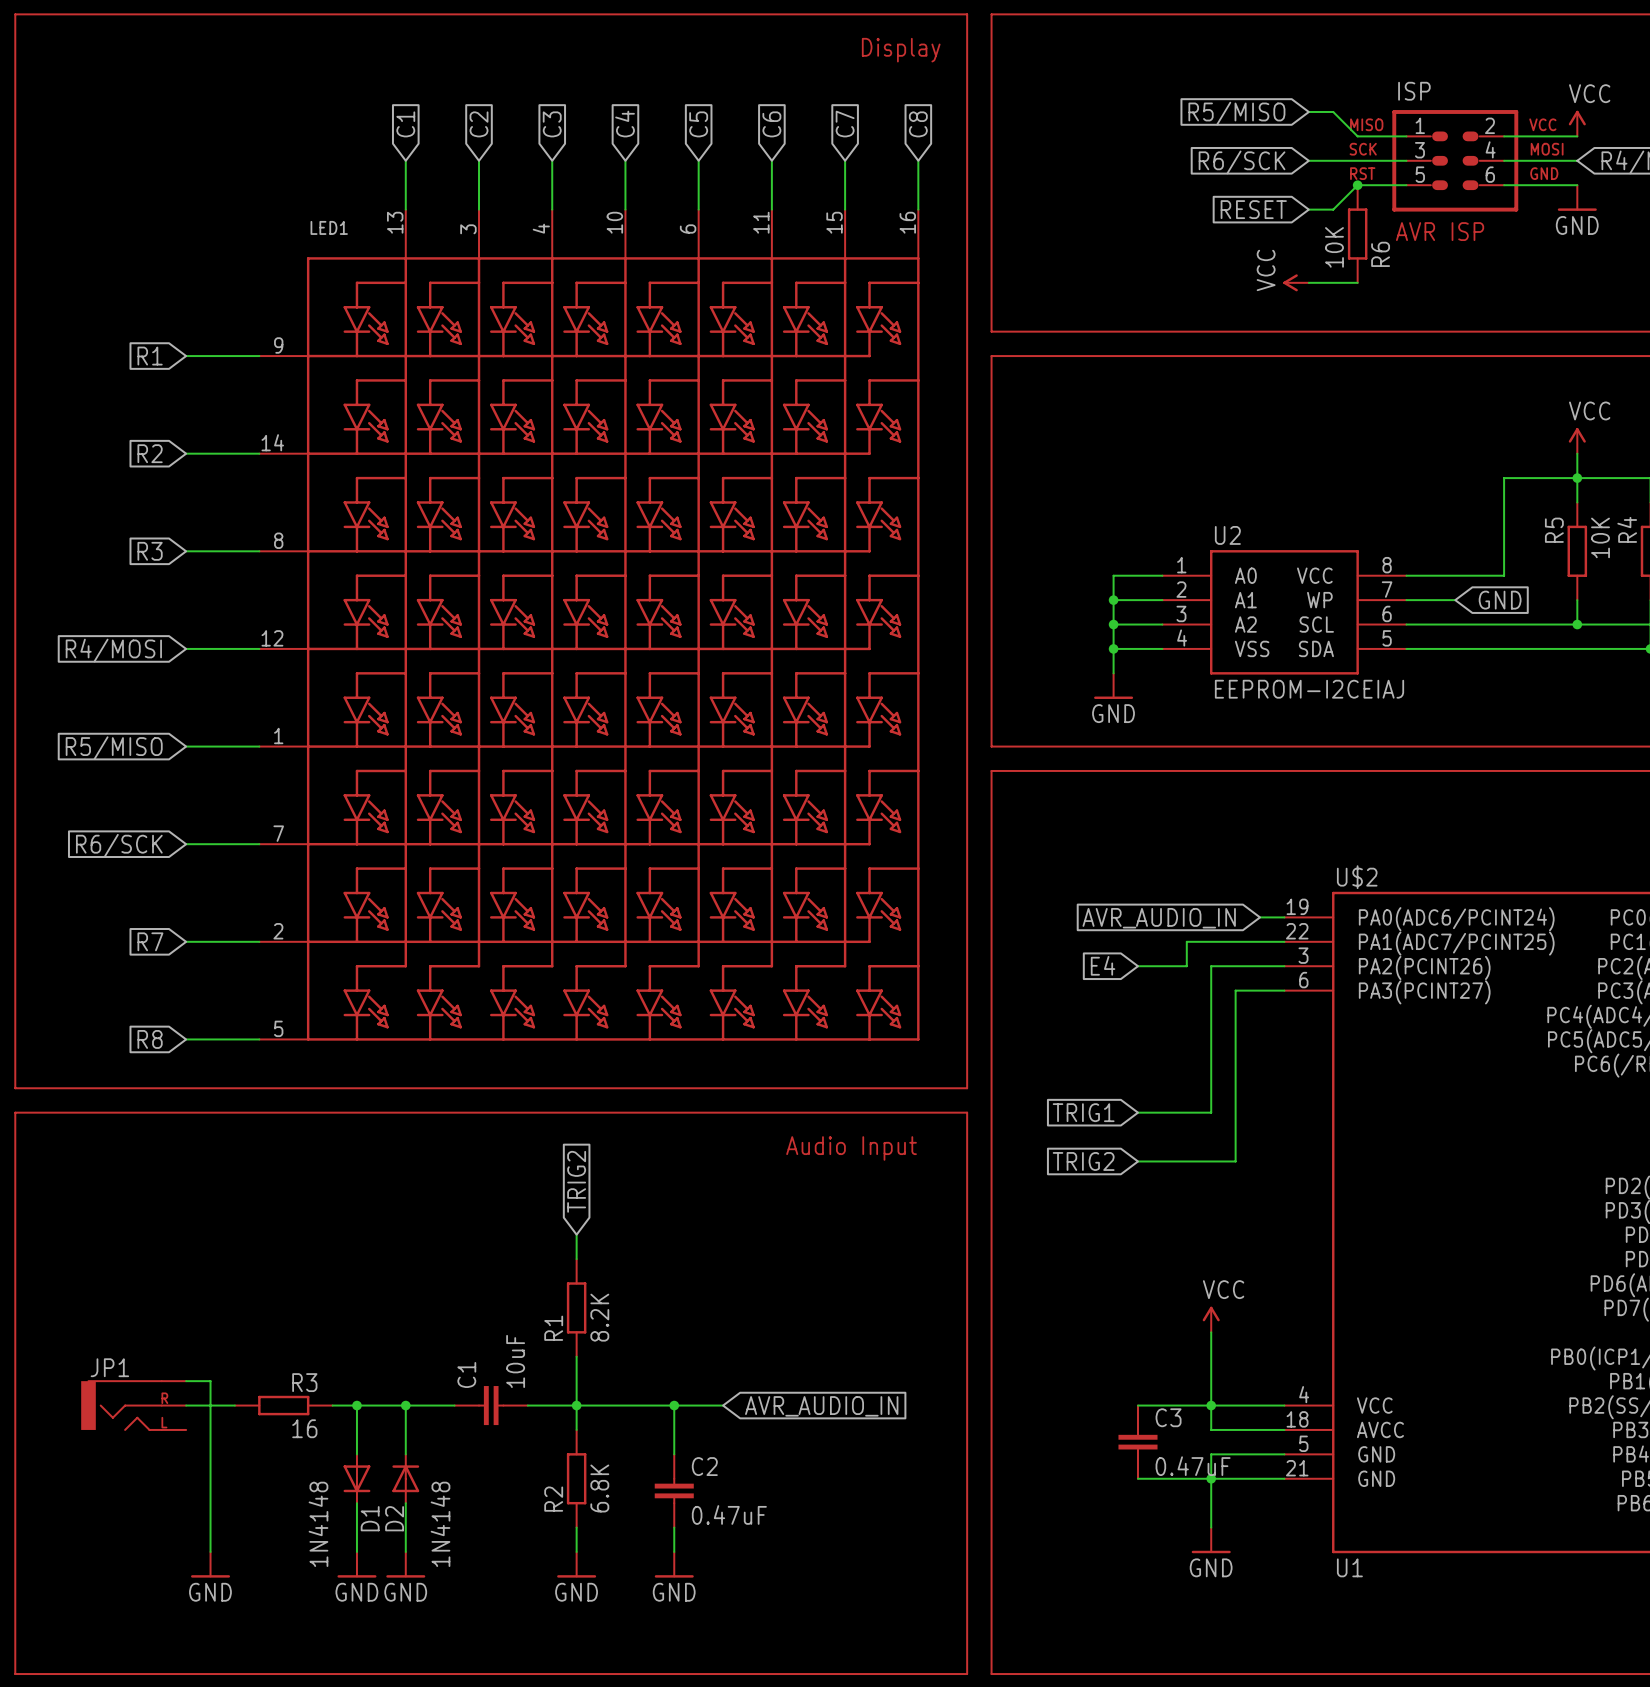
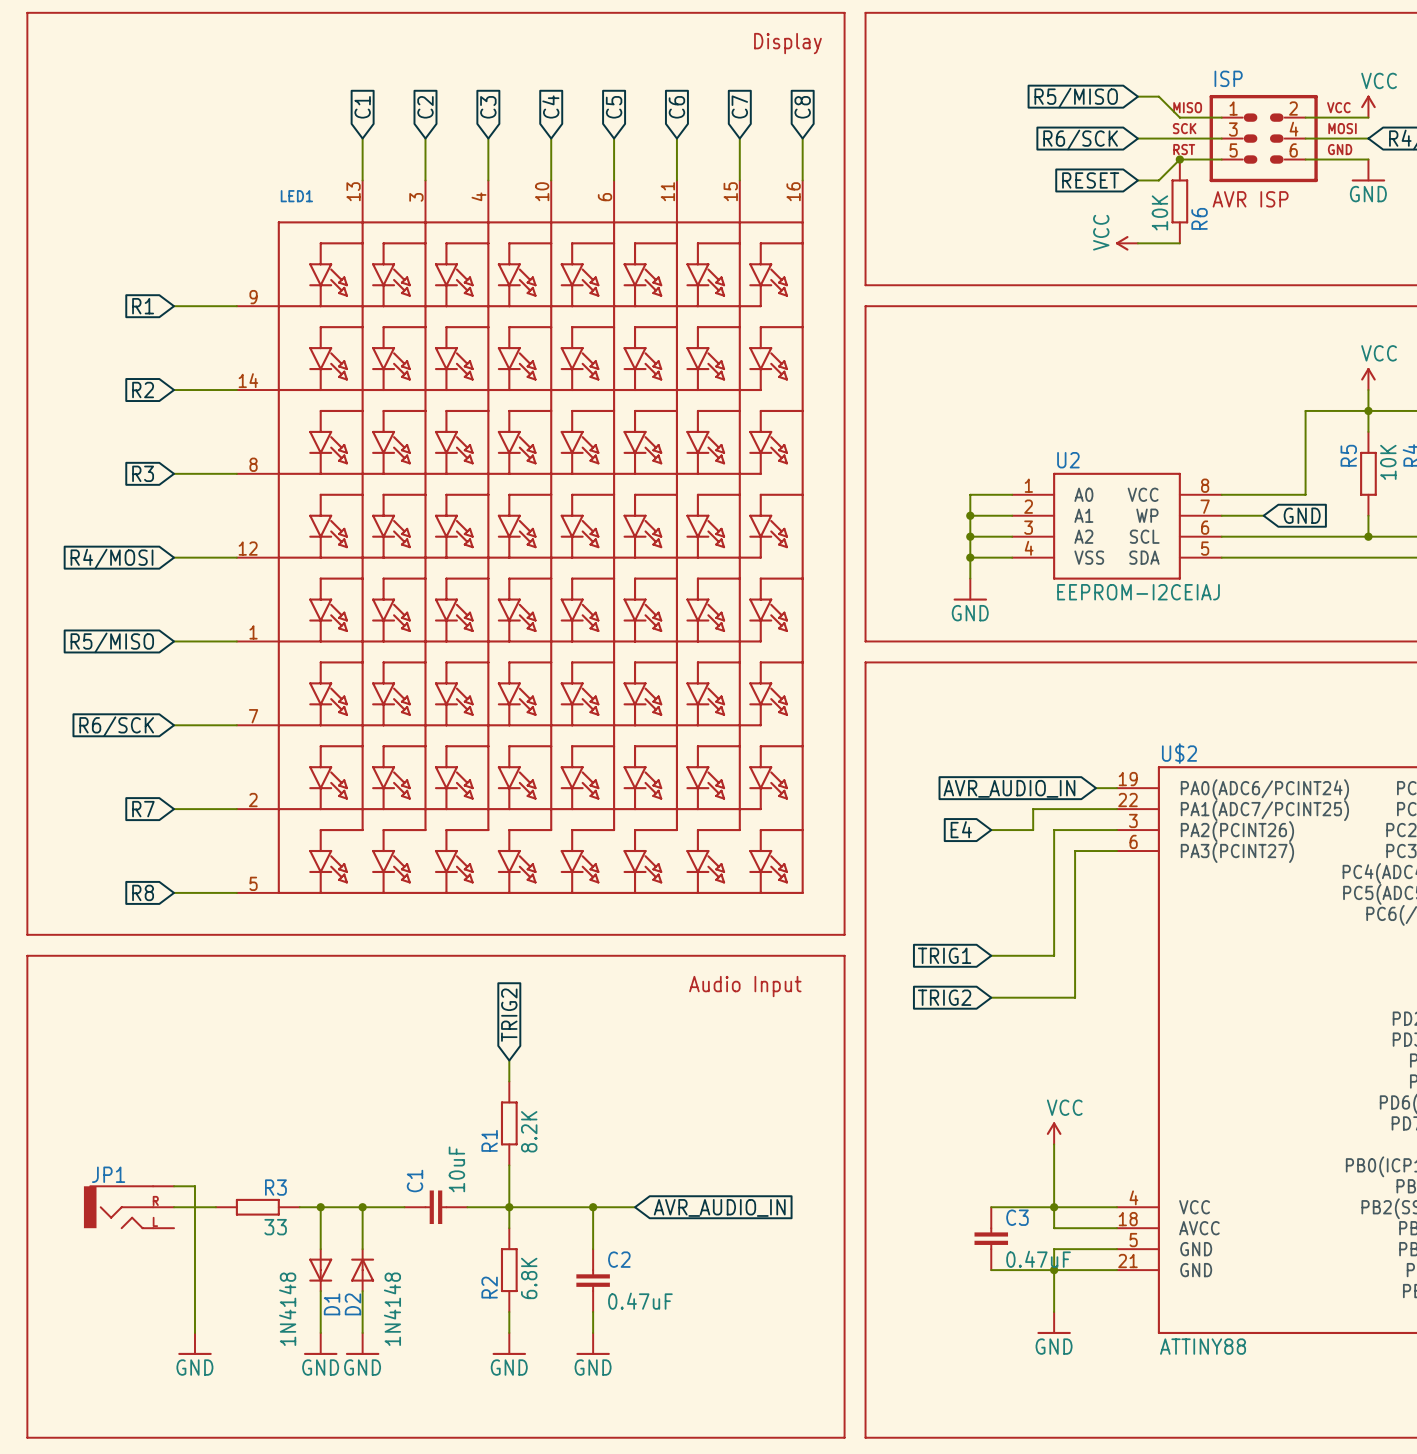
R3 value: 16 (304, 1428) -> 33 (275, 1227)
U$2 value: U1 (1349, 1567) -> ATTINY88 (1203, 1346)

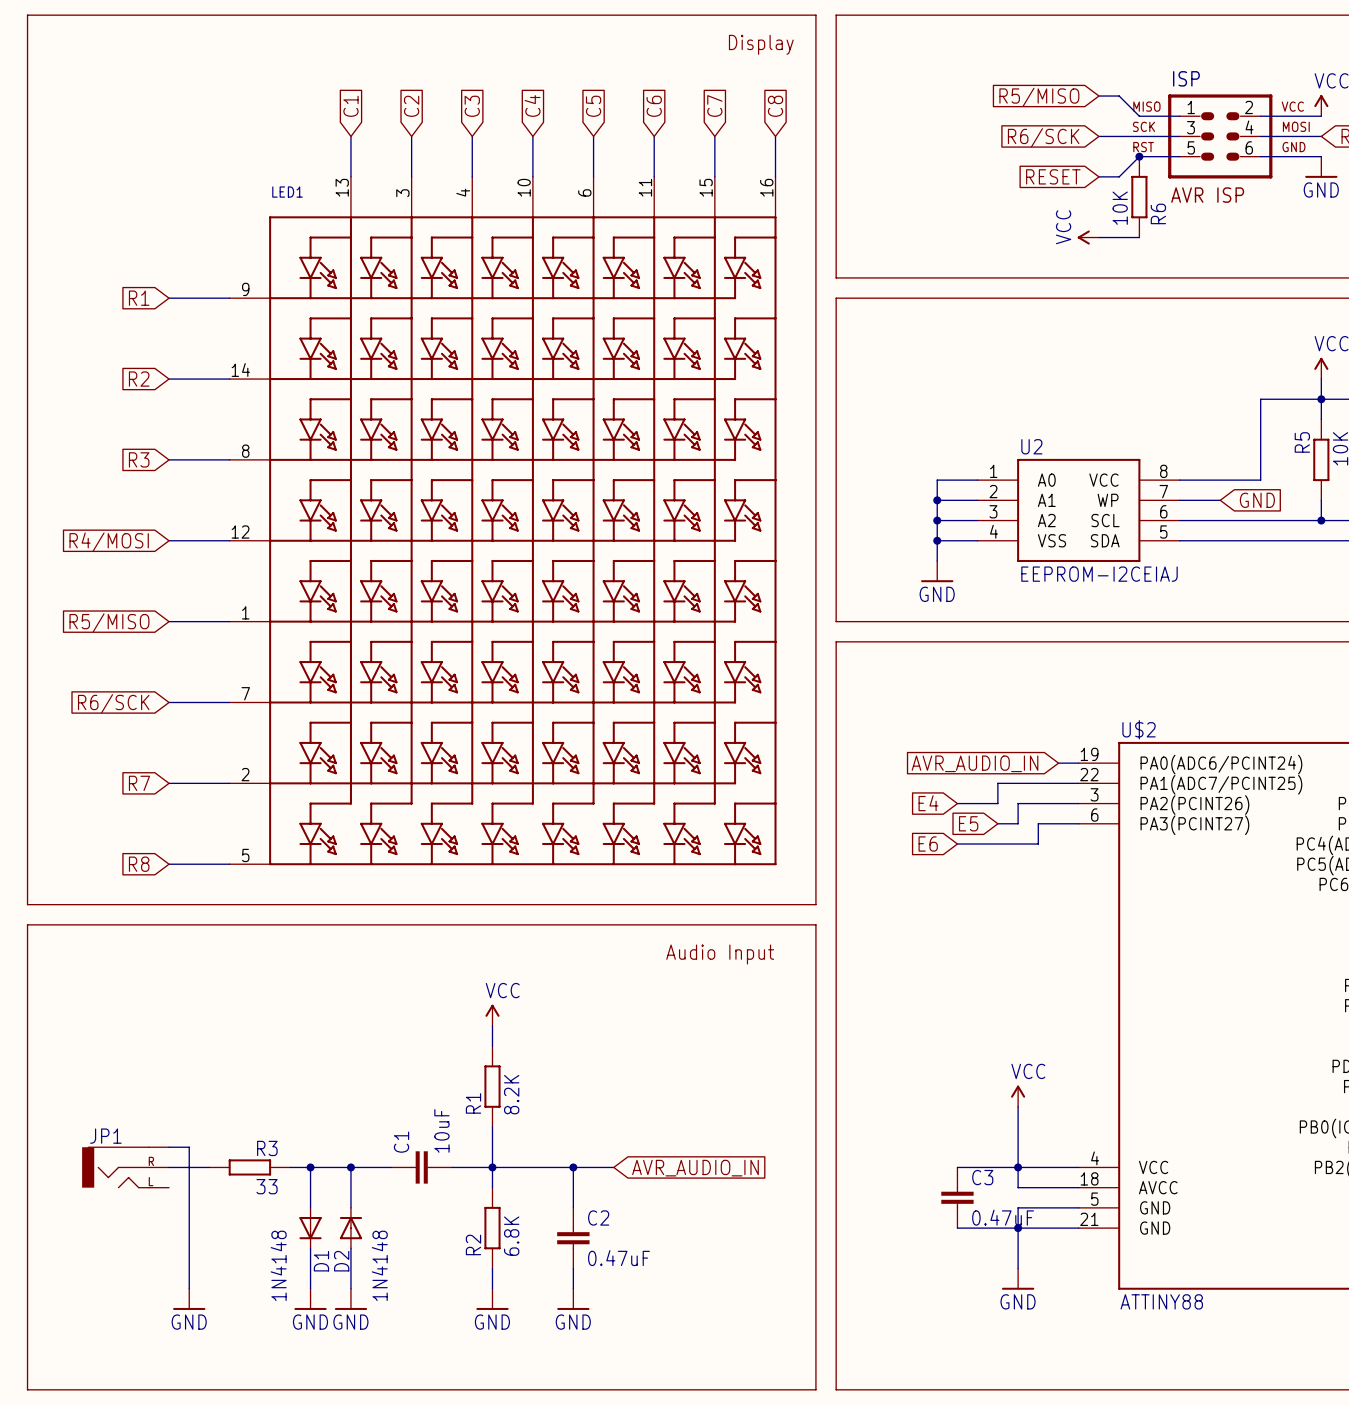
global label: none -> E5 (968, 823)
wire: (1054, 851) (1054, 955) (991, 955) -> (1018, 823) (997, 823)
global label: none -> E6 (928, 844)
wire: (1075, 871) (1075, 997) (991, 997) -> (1038, 844) (957, 844)
global label: TRIG1 (944, 955) -> none
global label: TRIG2 (944, 997) -> none
global label: TRIG2 (509, 1015) -> none
power symbol: none -> VCC (492, 1015)

